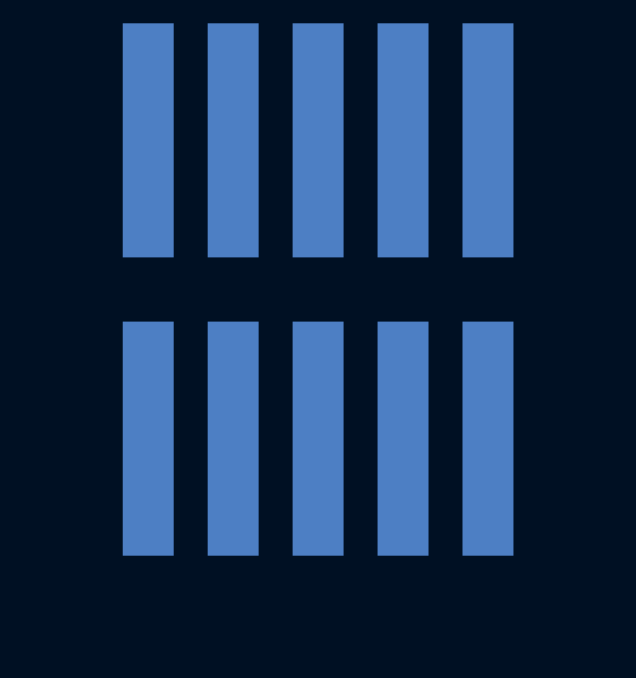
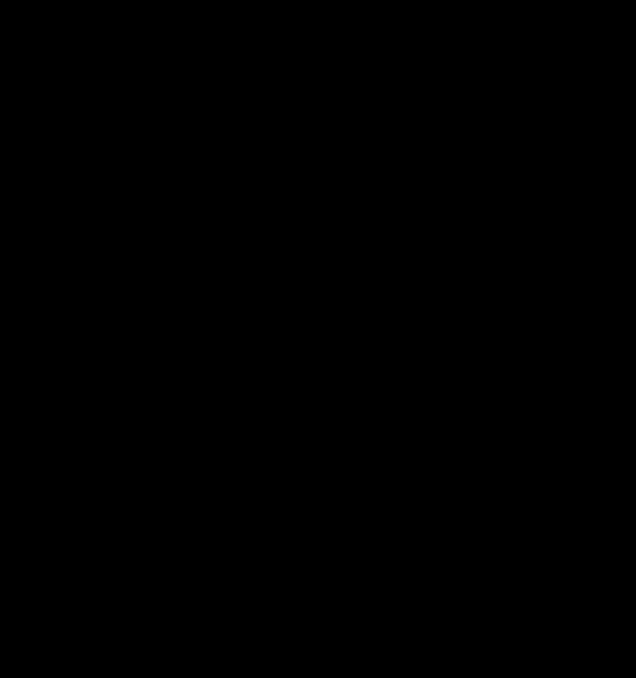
part: (318, 140) -> none
part: (318, 438) -> none

